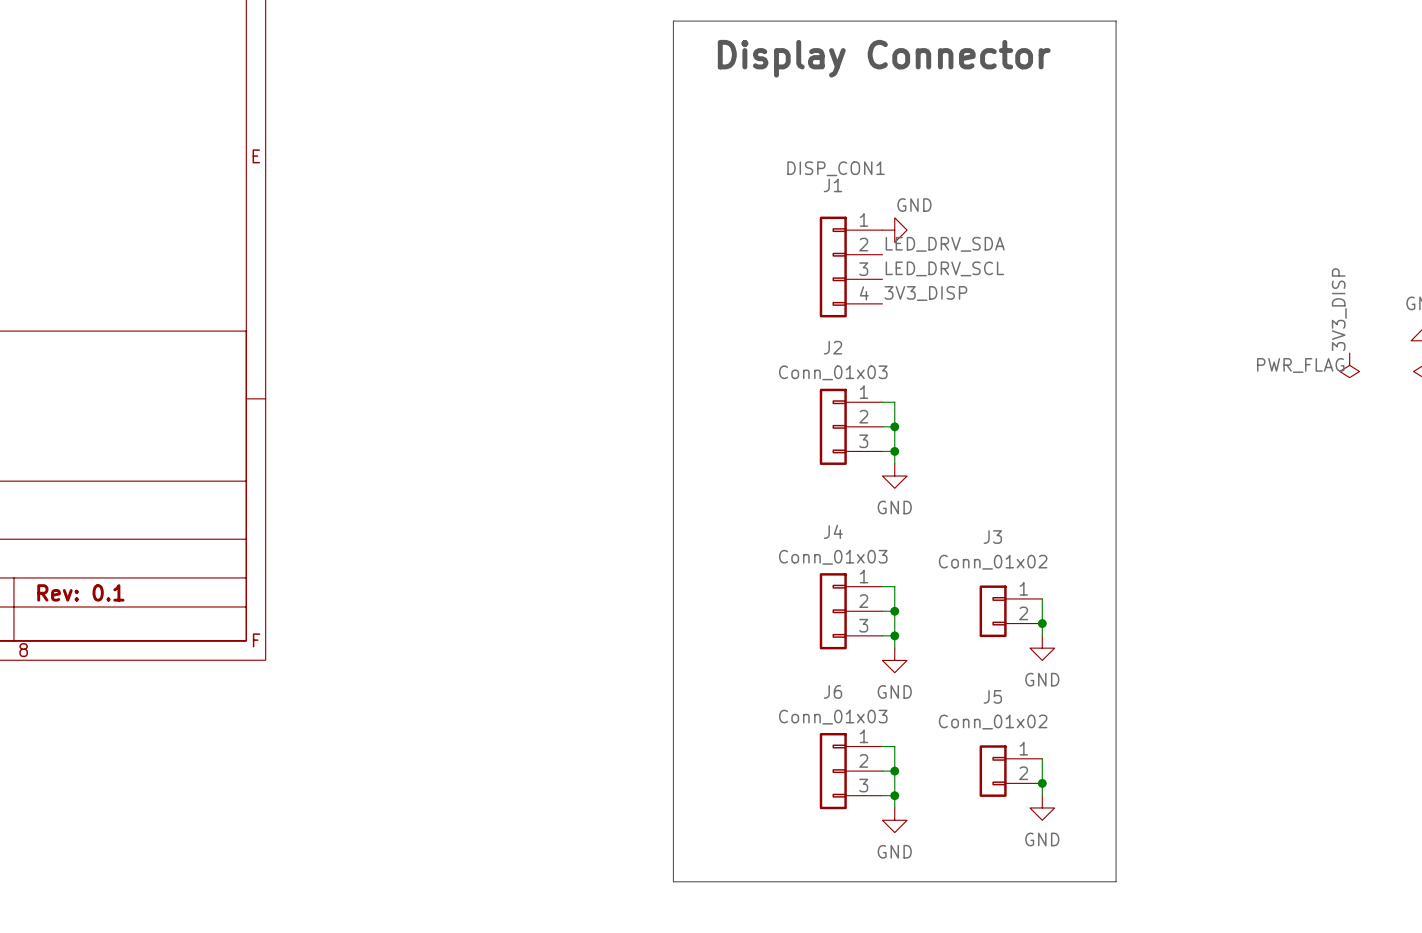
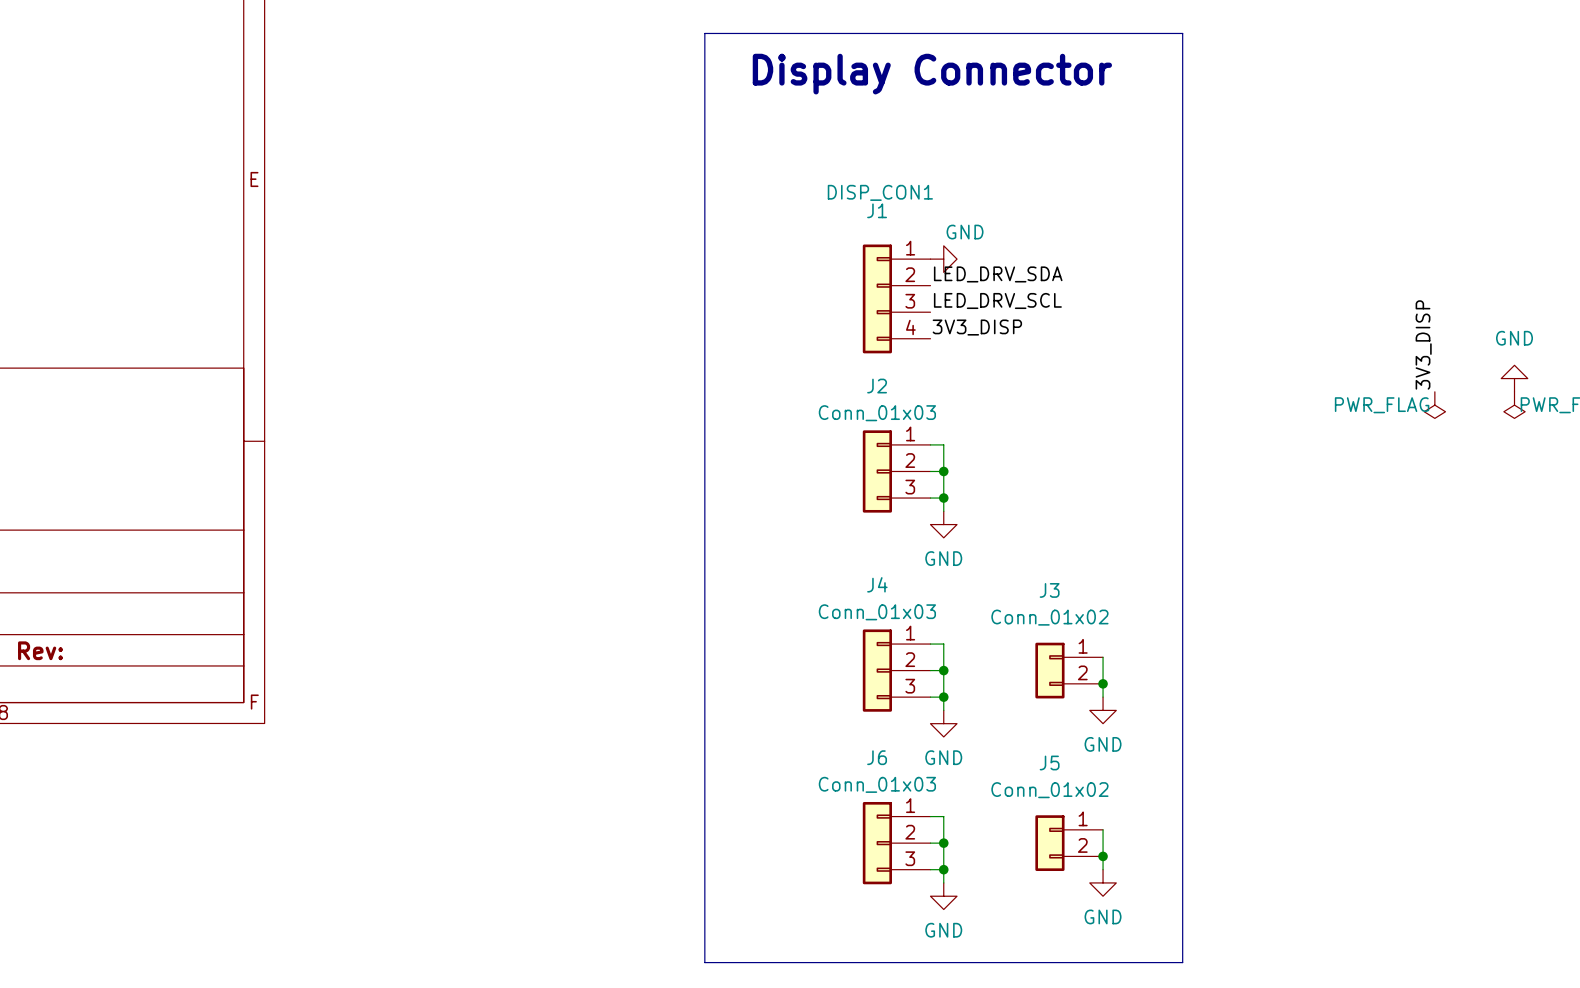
title block: Rev: 0.1 (80, 592) -> Rev: (40, 650)

